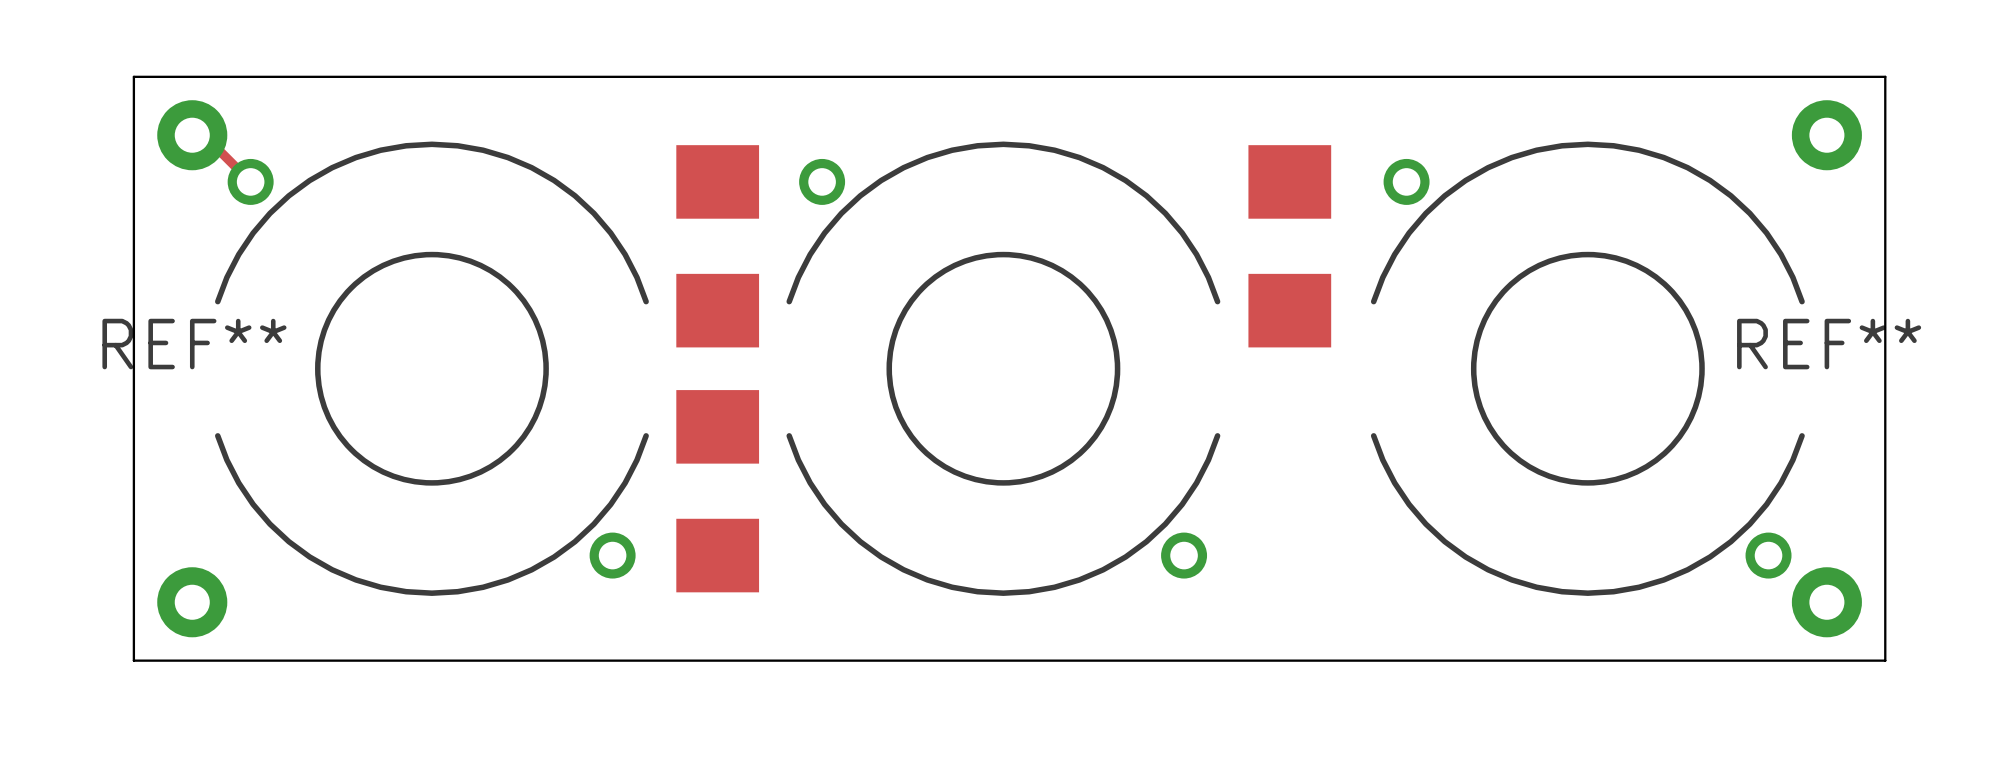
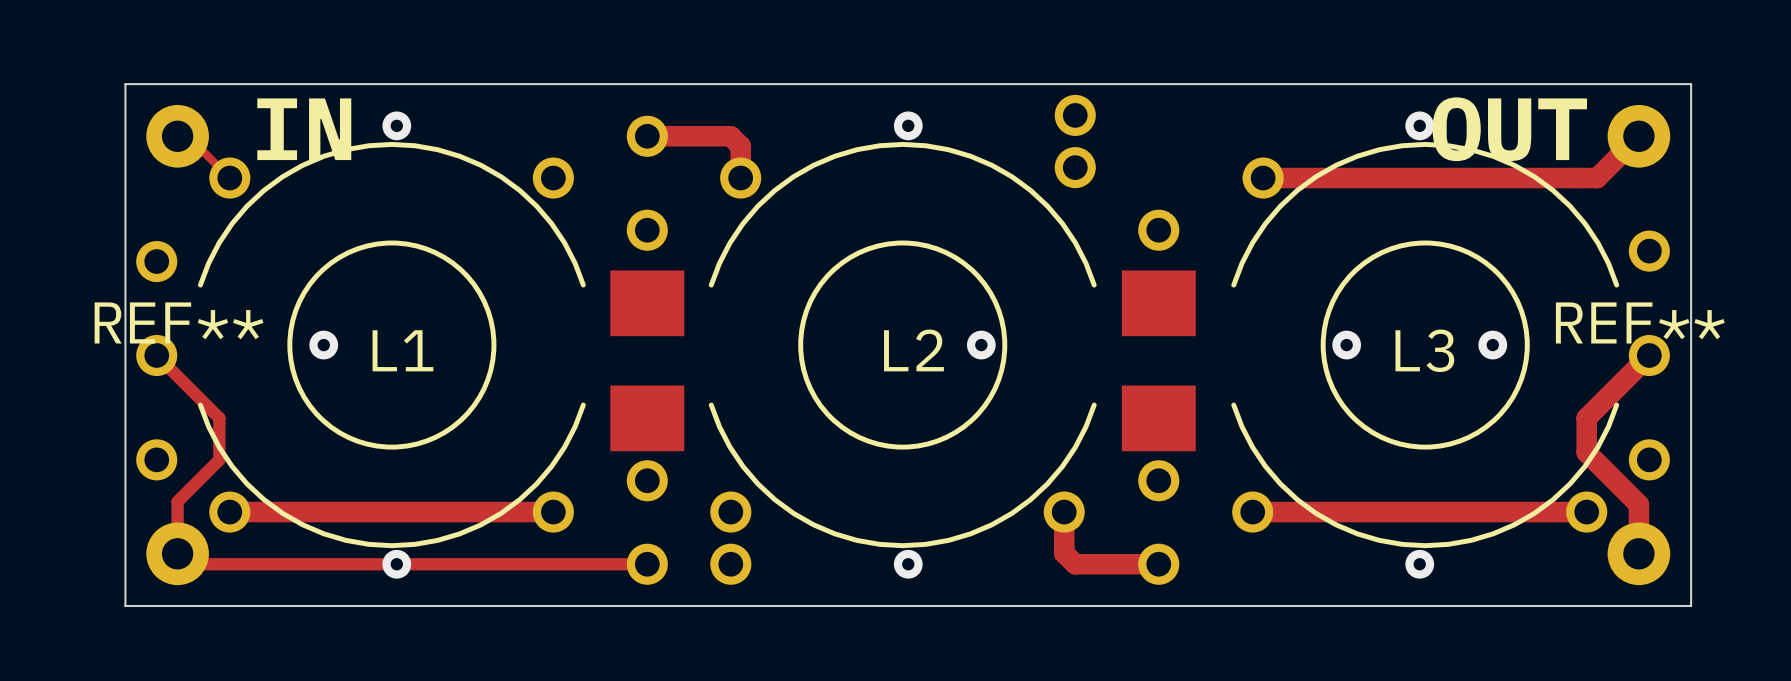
part: none -> (1075, 115)
via: none -> (396, 125)
via: none -> (908, 125)
via: none -> (1419, 125)
text: none -> IN (304, 129)
text: none -> OUT (1509, 129)
track: none -> (647, 136) (730, 136) (740, 146) (740, 178)
part: none -> (647, 136)
track: none -> (1638, 136) (1597, 178) (1252, 178)
part footprint: [215, 141, 649, 596] -> [197, 141, 586, 549]
part footprint: [676, 145, 760, 348] -> [626, 209, 668, 251]
part footprint: [1248, 145, 1332, 348] -> [1138, 209, 1180, 251]
part: none -> (1075, 167)
part: none -> (553, 178)
part: none -> (1649, 251)
part: none -> (156, 261)
via: none -> (323, 345)
via: none -> (981, 345)
via: none -> (1346, 345)
via: none -> (1492, 345)
text: none -> L1 (402, 350)
text: none -> L2 (913, 350)
text: none -> L3 (1424, 350)
track: none -> (156, 355) (219, 418) (219, 459) (177, 501) (177, 553) (188, 564) (647, 564)
part: none -> (156, 355)
track: none -> (1649, 355) (1586, 418) (1586, 452) (1638, 504) (1638, 553) (1618, 553)
part: none -> (1649, 355)
part: none -> (647, 360)
part: none -> (1158, 360)
part footprint: [676, 390, 760, 593] -> [626, 460, 668, 502]
part: none -> (156, 459)
part: none -> (1649, 459)
part: none -> (1158, 480)
track: none -> (229, 512) (553, 512)
part: none -> (553, 512)
part: none -> (730, 512)
track: none -> (1064, 512) (1064, 553) (1075, 564) (1158, 564)
track: none -> (1252, 512) (1576, 512)
part: none -> (1252, 512)
via: none -> (396, 564)
part: none -> (647, 564)
part: none -> (730, 564)
via: none -> (908, 564)
part: none -> (1158, 564)
via: none -> (1419, 564)

